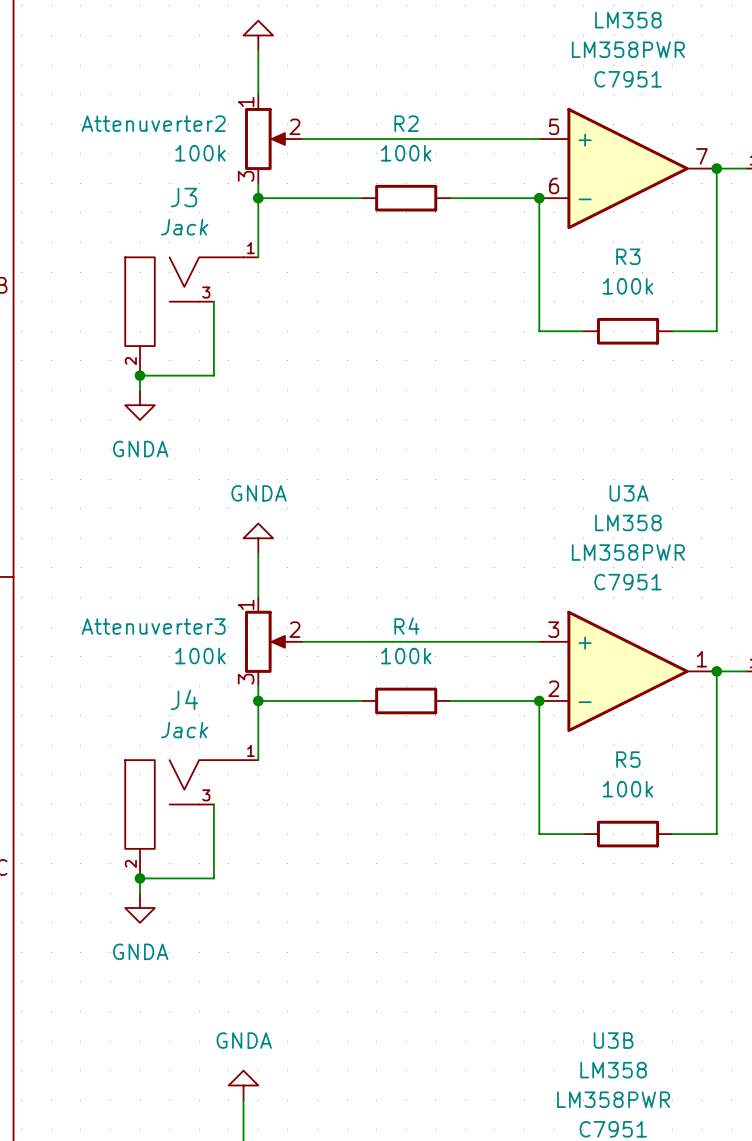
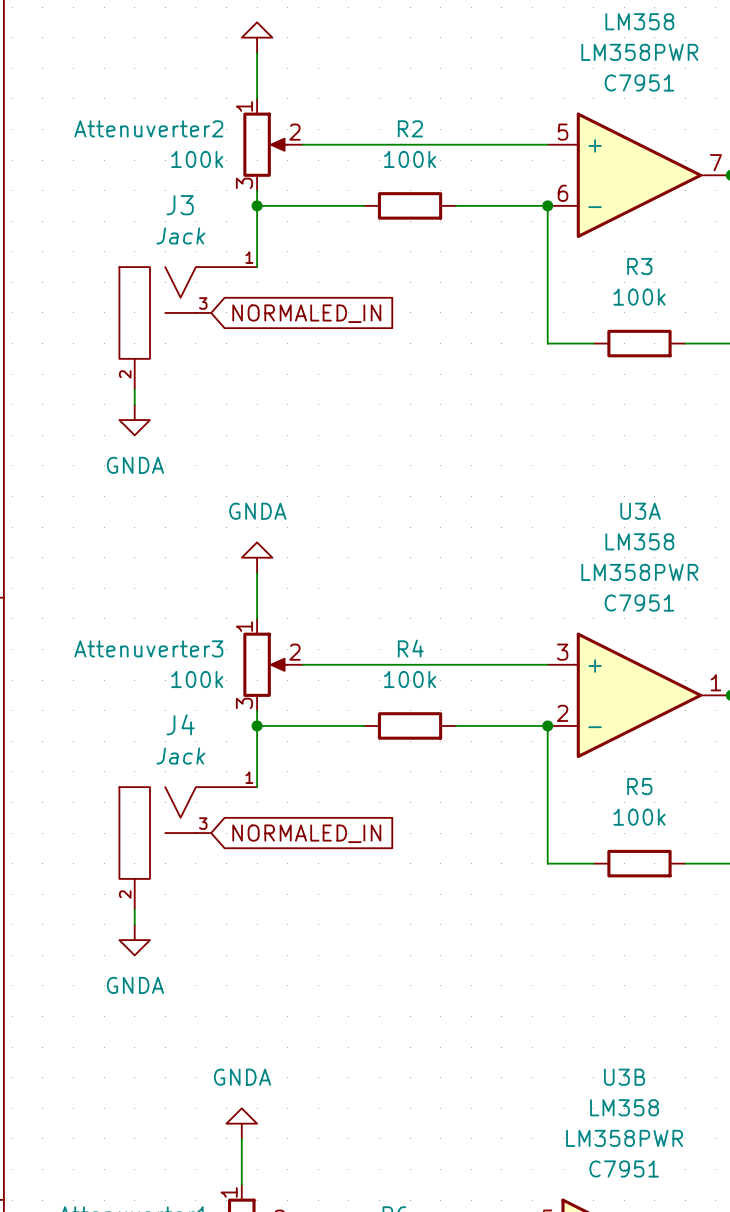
wire: (213, 301) (213, 375) (140, 375) -> none
global label: none -> NORMALED_IN (306, 313)
junction: (140, 375) -> none
wire: (213, 804) (213, 878) (140, 878) -> none
global label: none -> NORMALED_IN (306, 833)
junction: (140, 878) -> none

